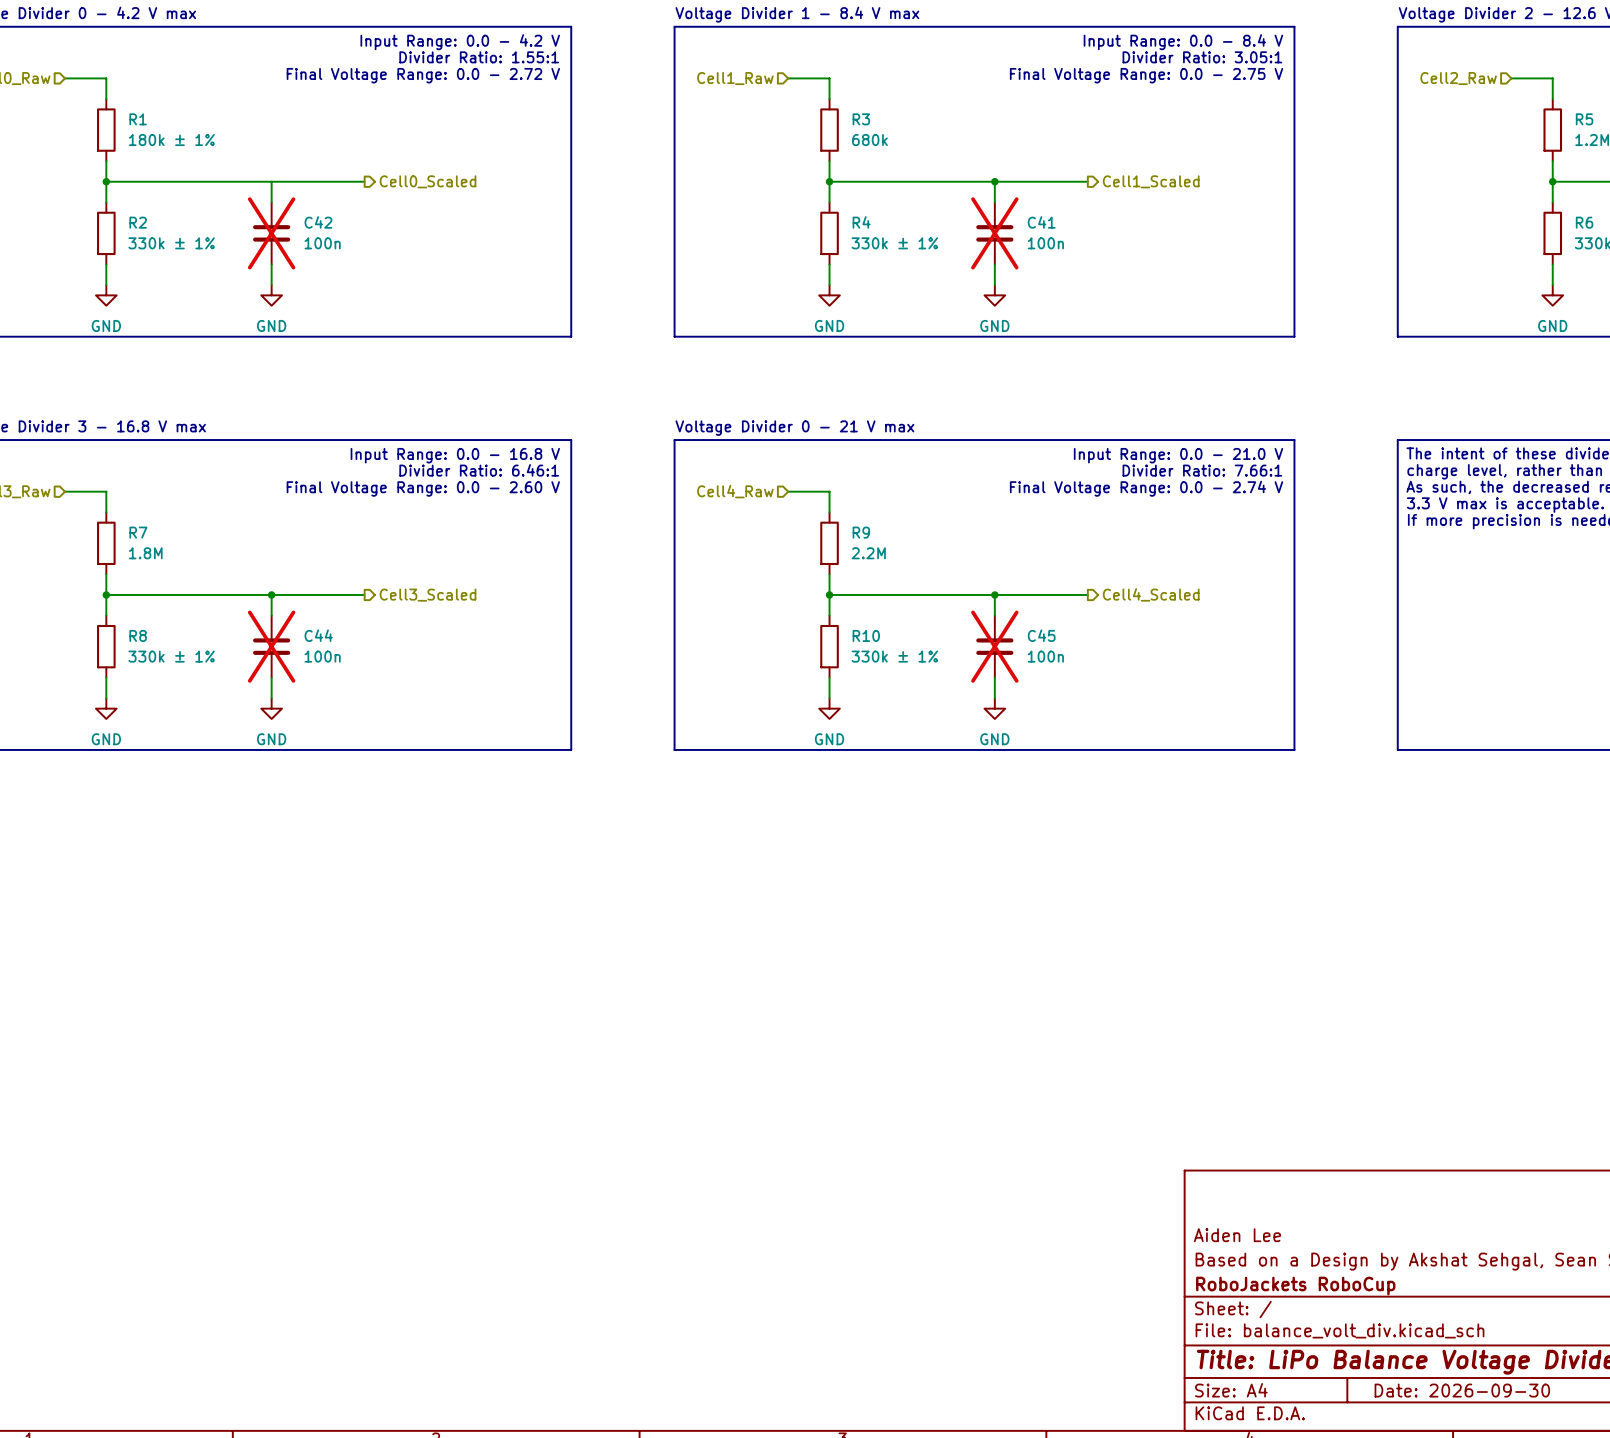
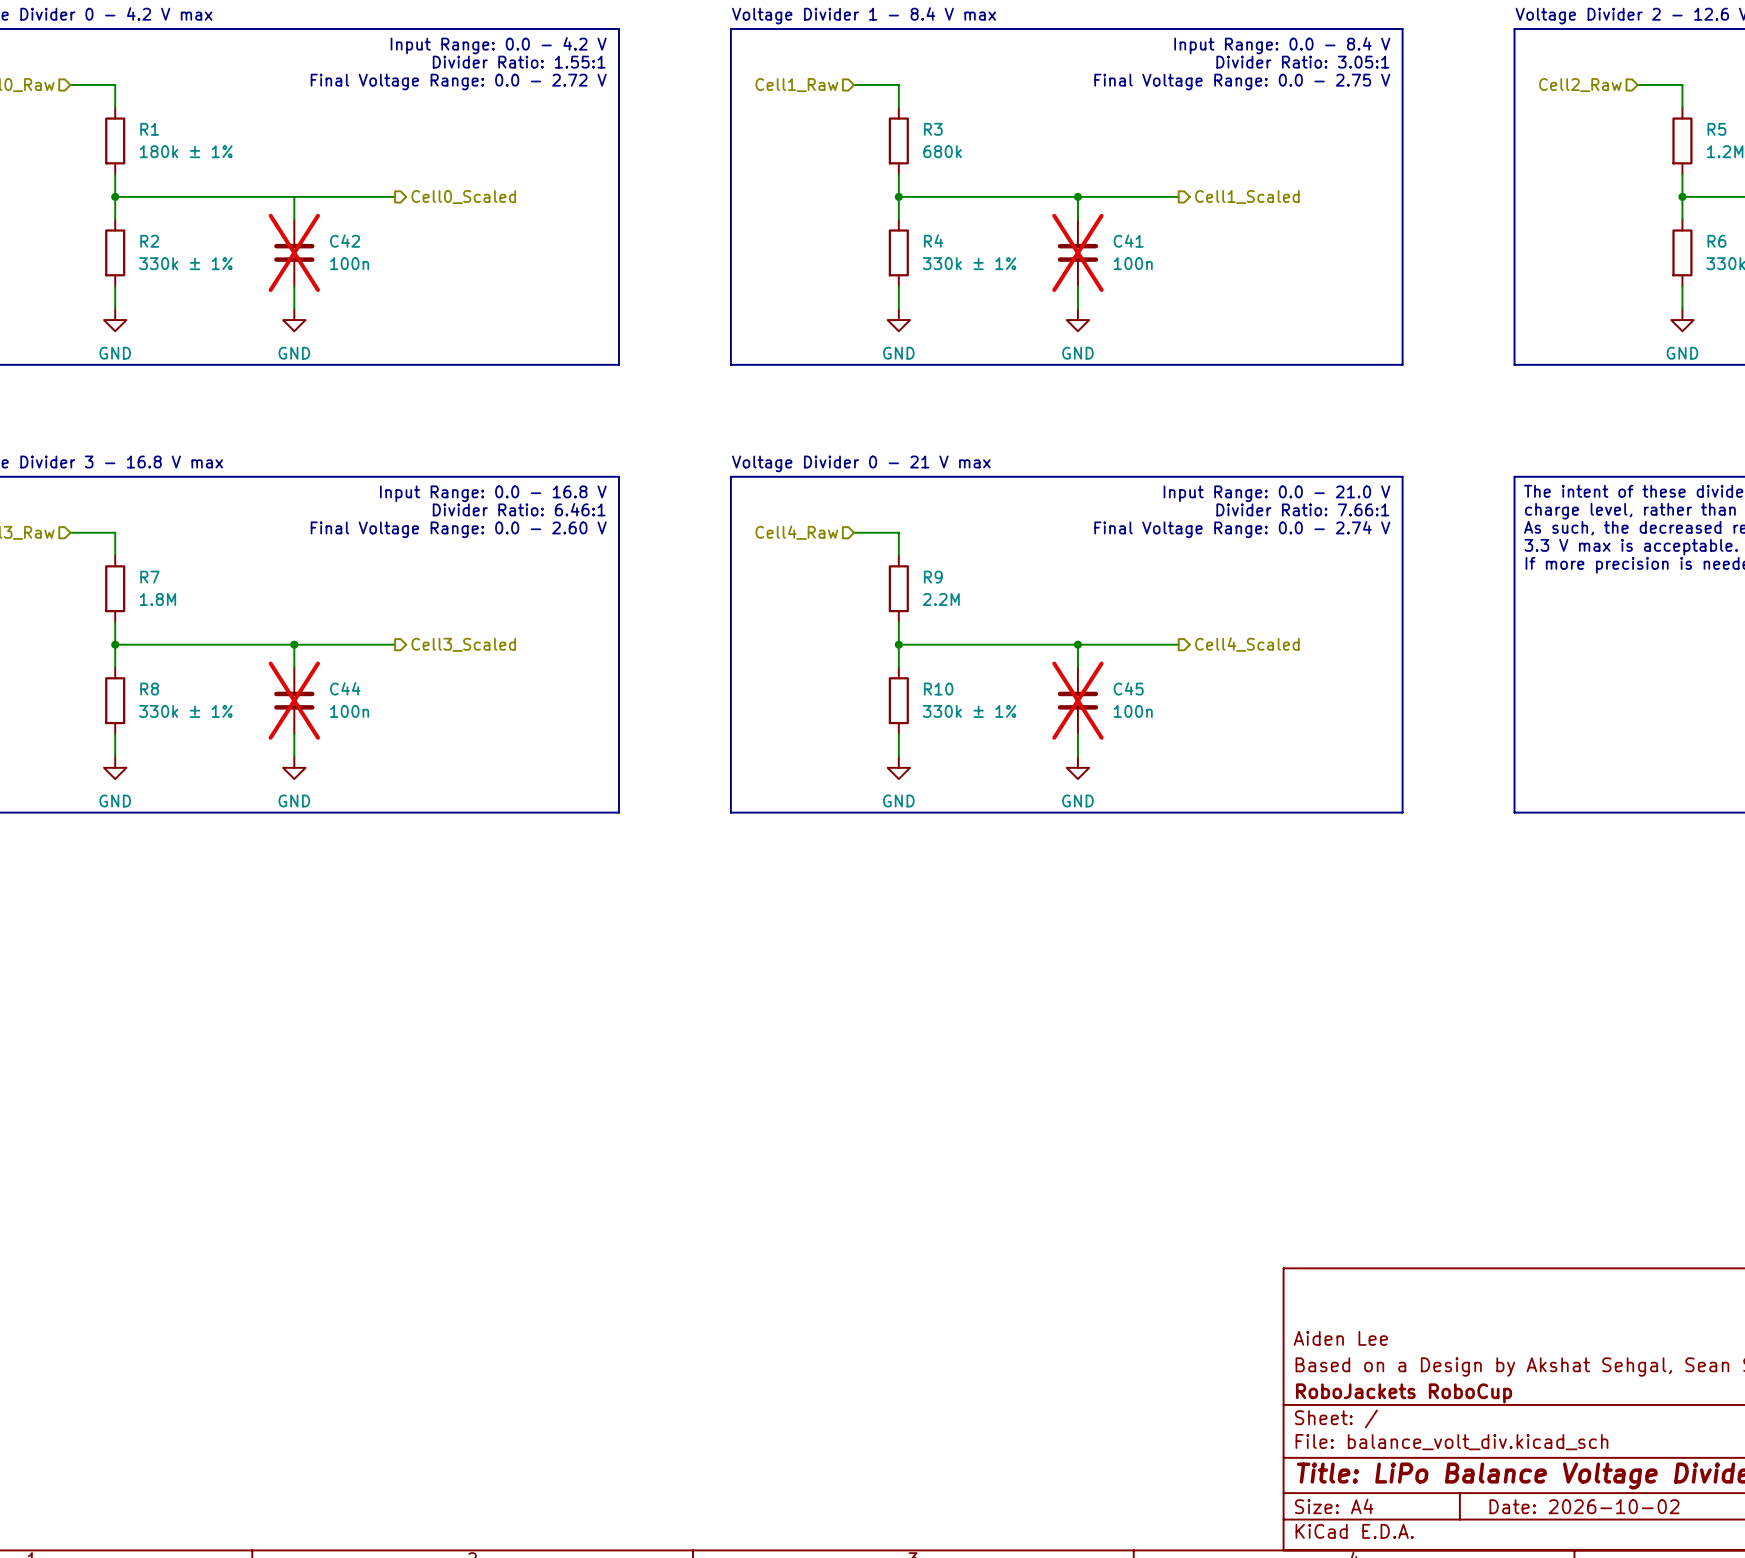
title block: Date: 2026-09-30 (1462, 1390) -> Date: 2026-10-02 (1584, 1506)

